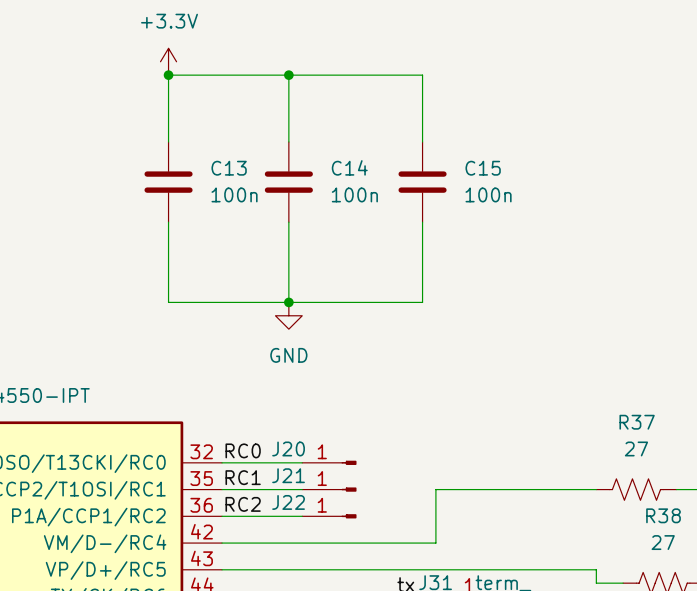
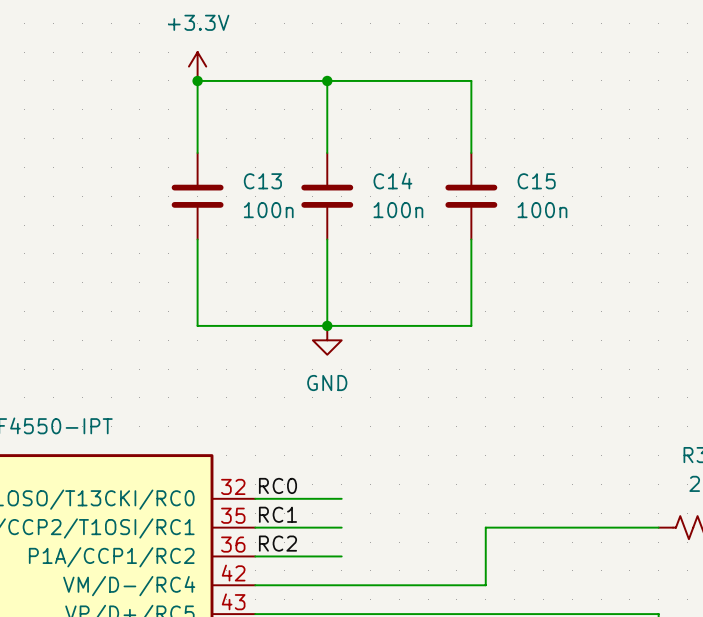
J20: (329, 462) -> none
J21: (329, 489) -> none
J22: (329, 516) -> none

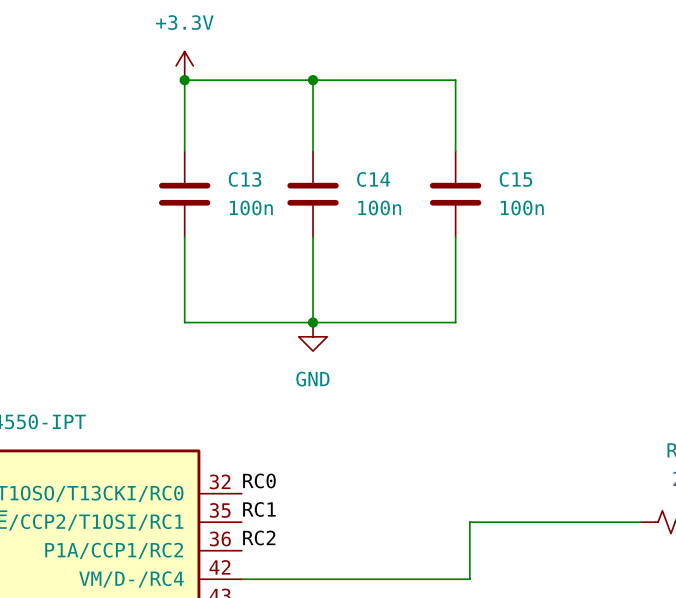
wire: (255, 498) (341, 498) -> none
wire: (255, 527) (341, 527) -> none
wire: (255, 556) (341, 556) -> none

